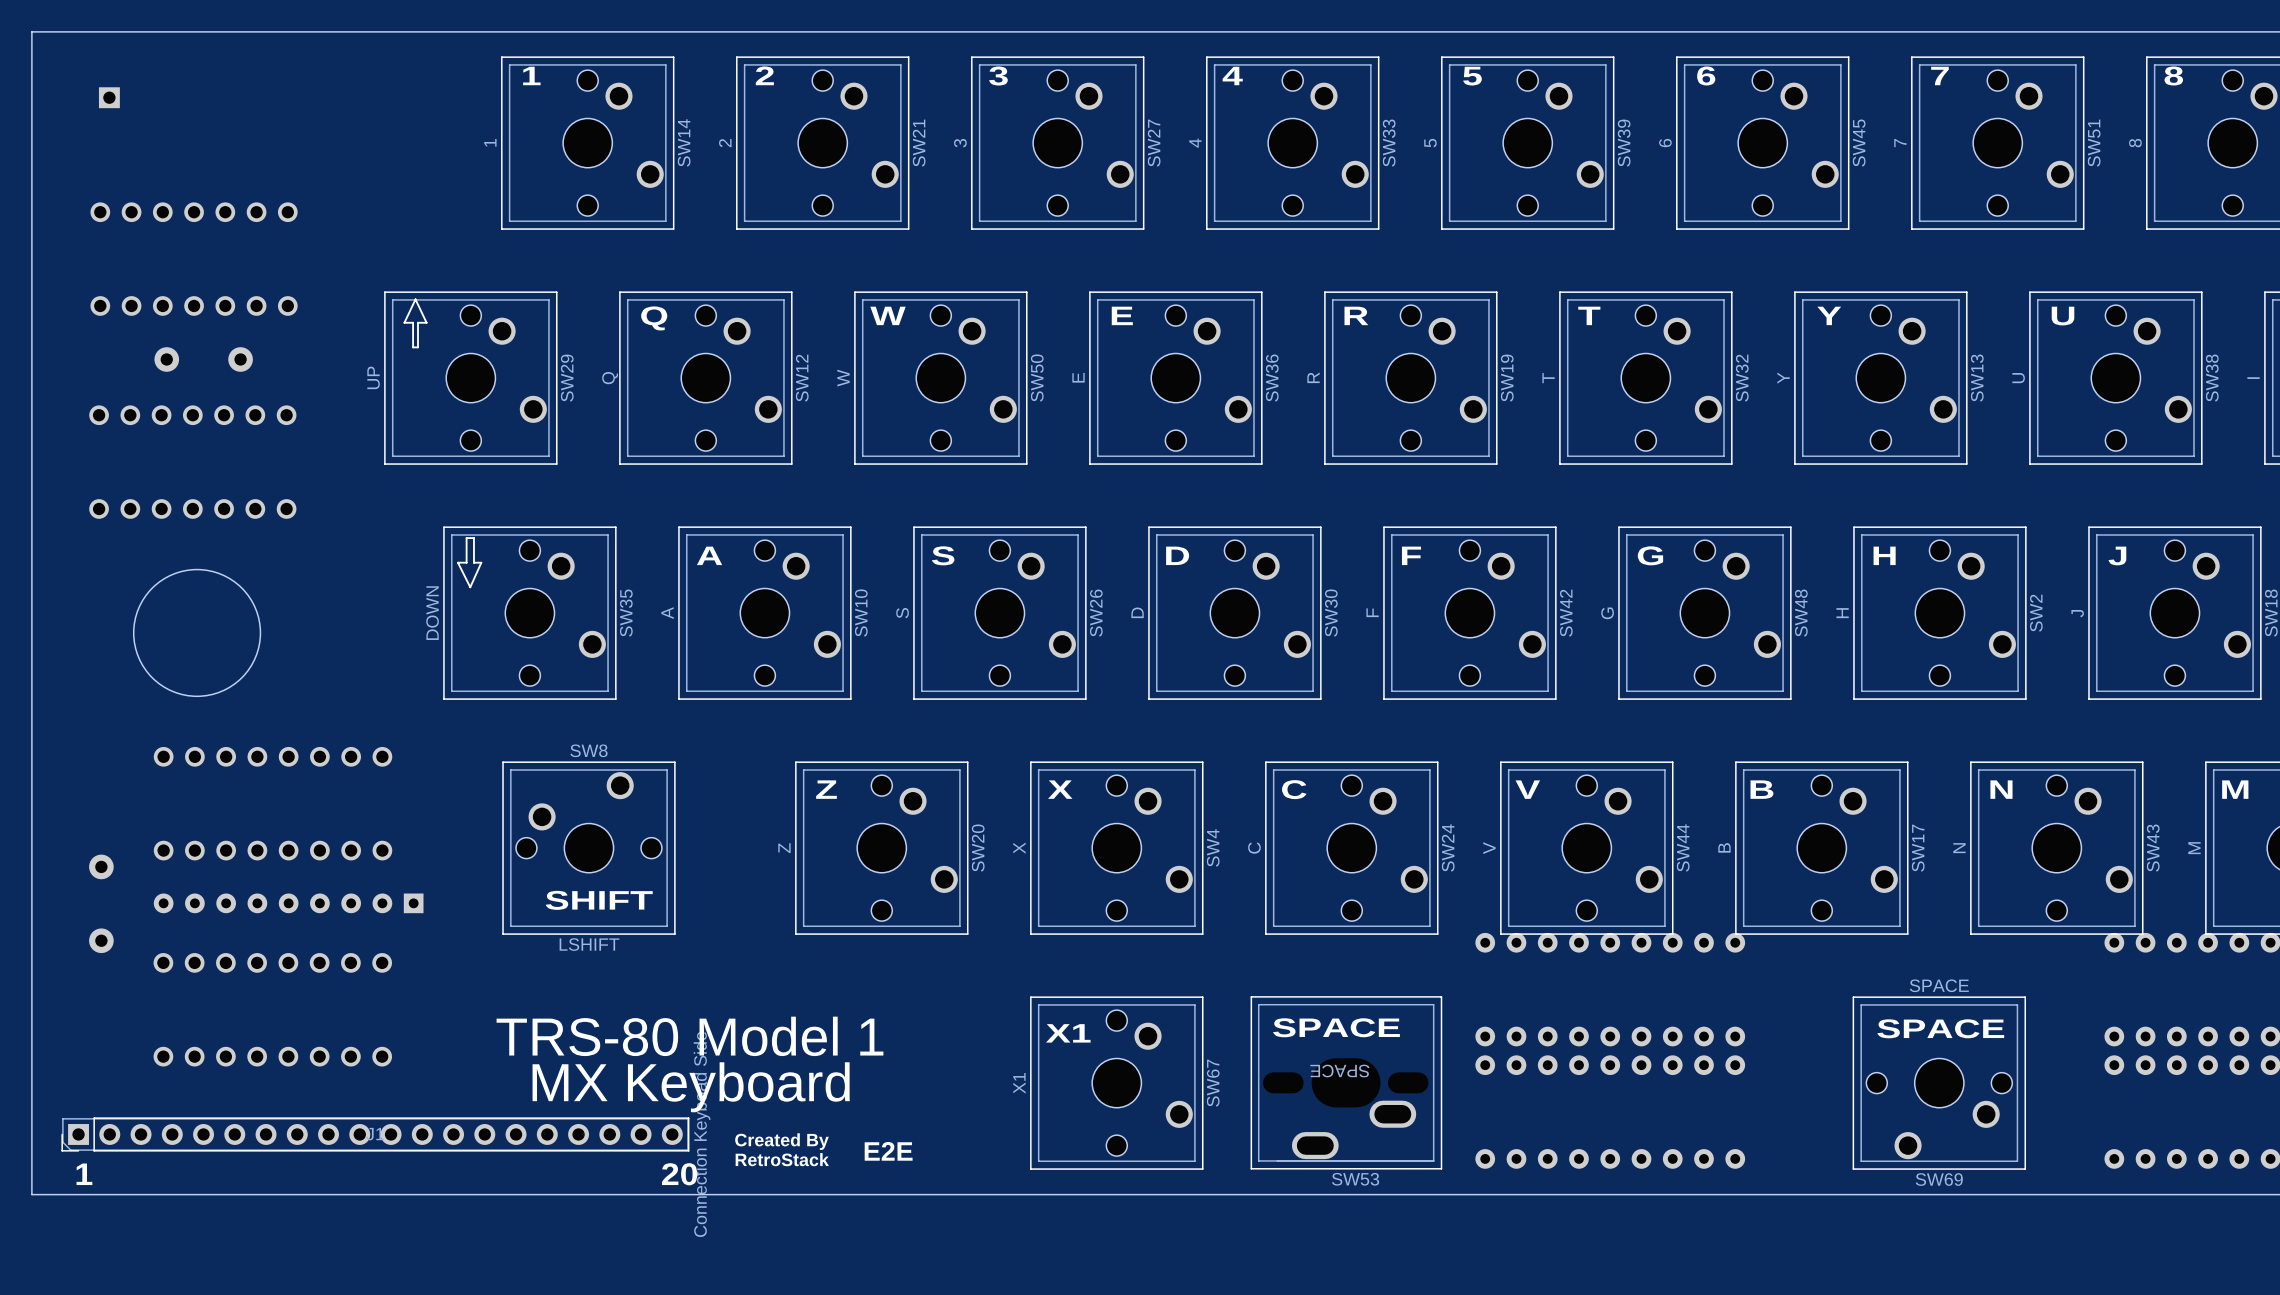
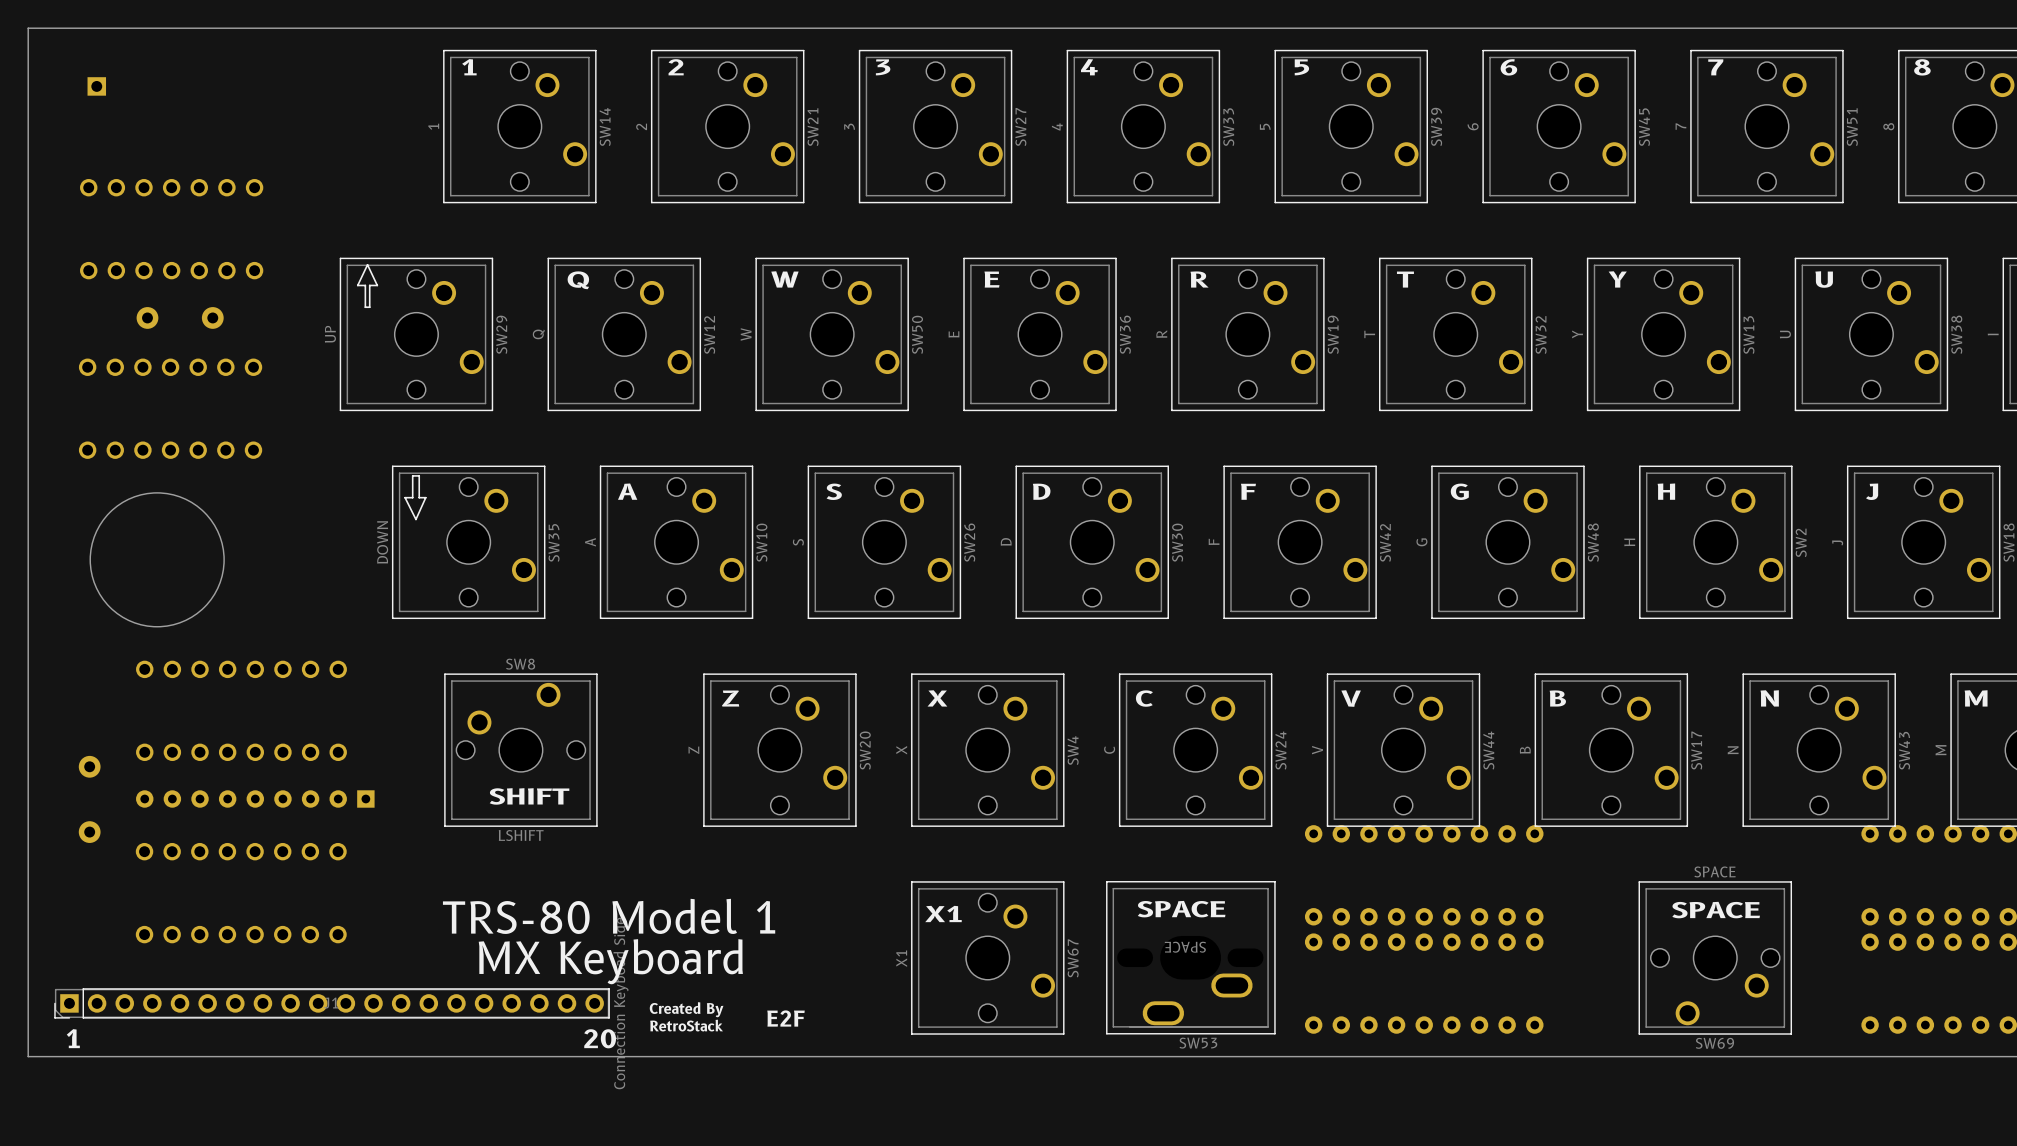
round board edge: none -> [89, 492, 225, 628]
round board edge: [133, 568, 262, 697] -> none
text: E2E (888, 1151) -> E2F (786, 1018)

